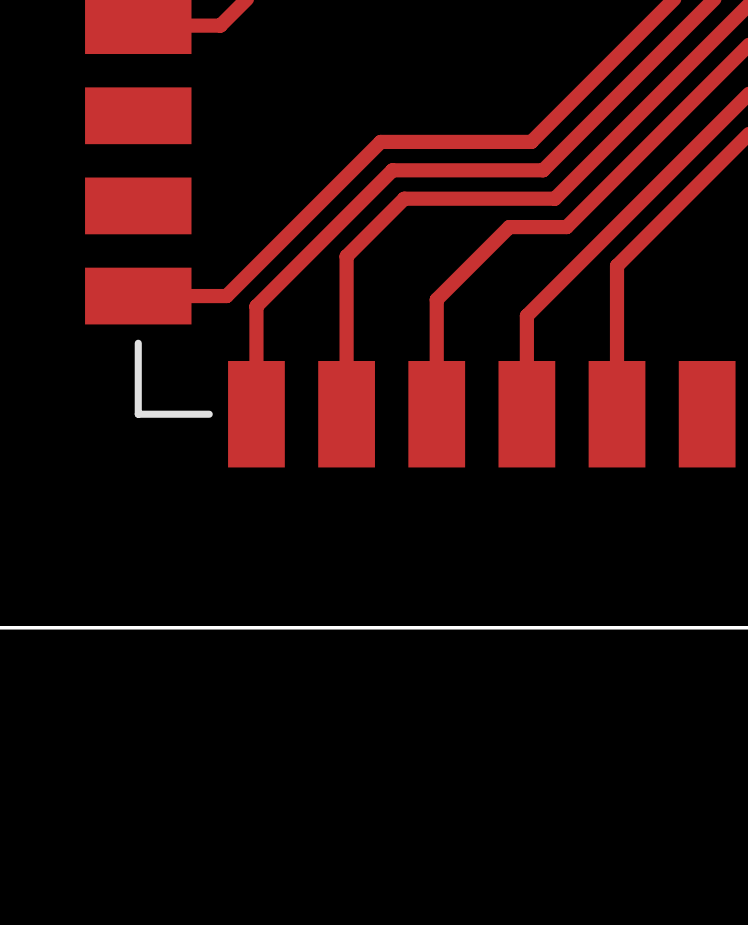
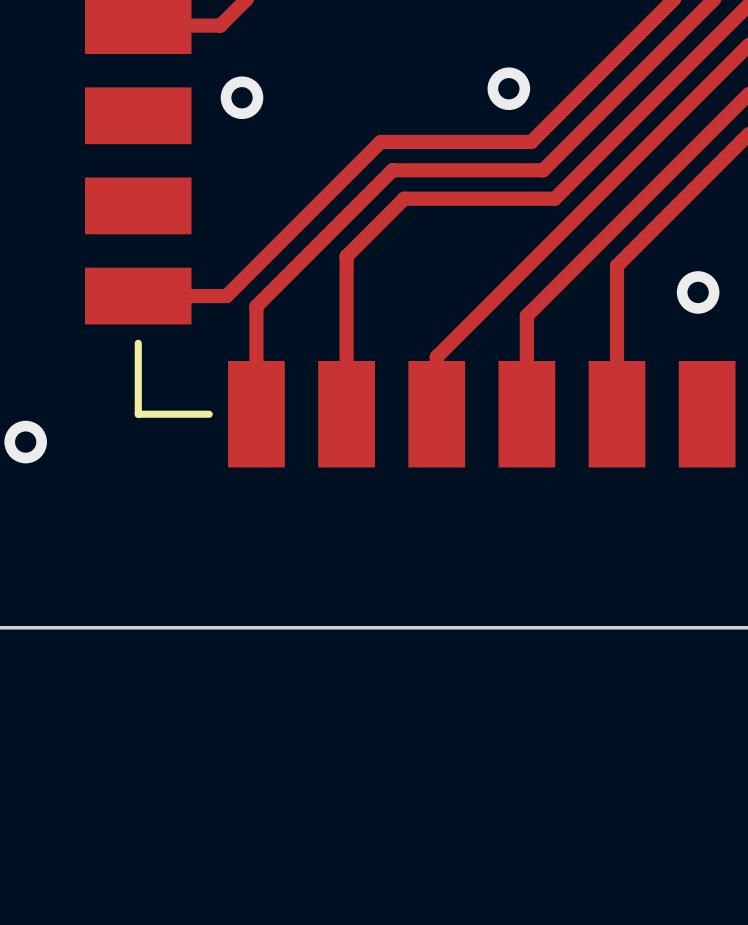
via: none -> (508, 88)
via: none -> (242, 97)
track: (566, 227) (509, 227) (436, 299) (436, 357) -> (566, 227) (436, 357)
via: none -> (698, 292)
via: none -> (25, 442)

